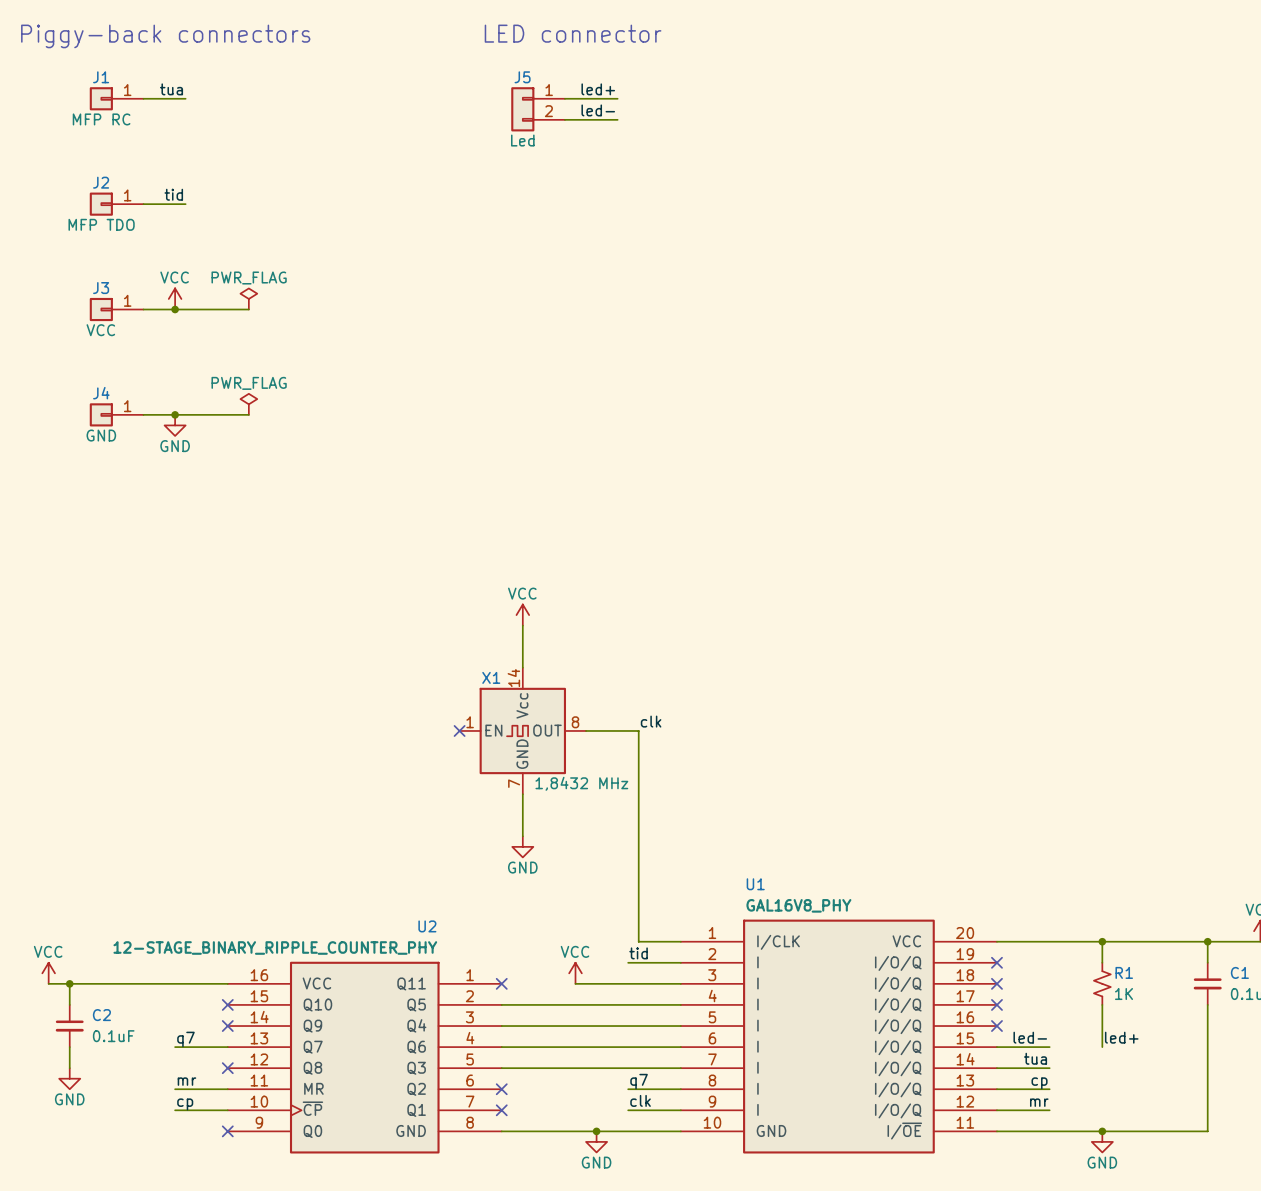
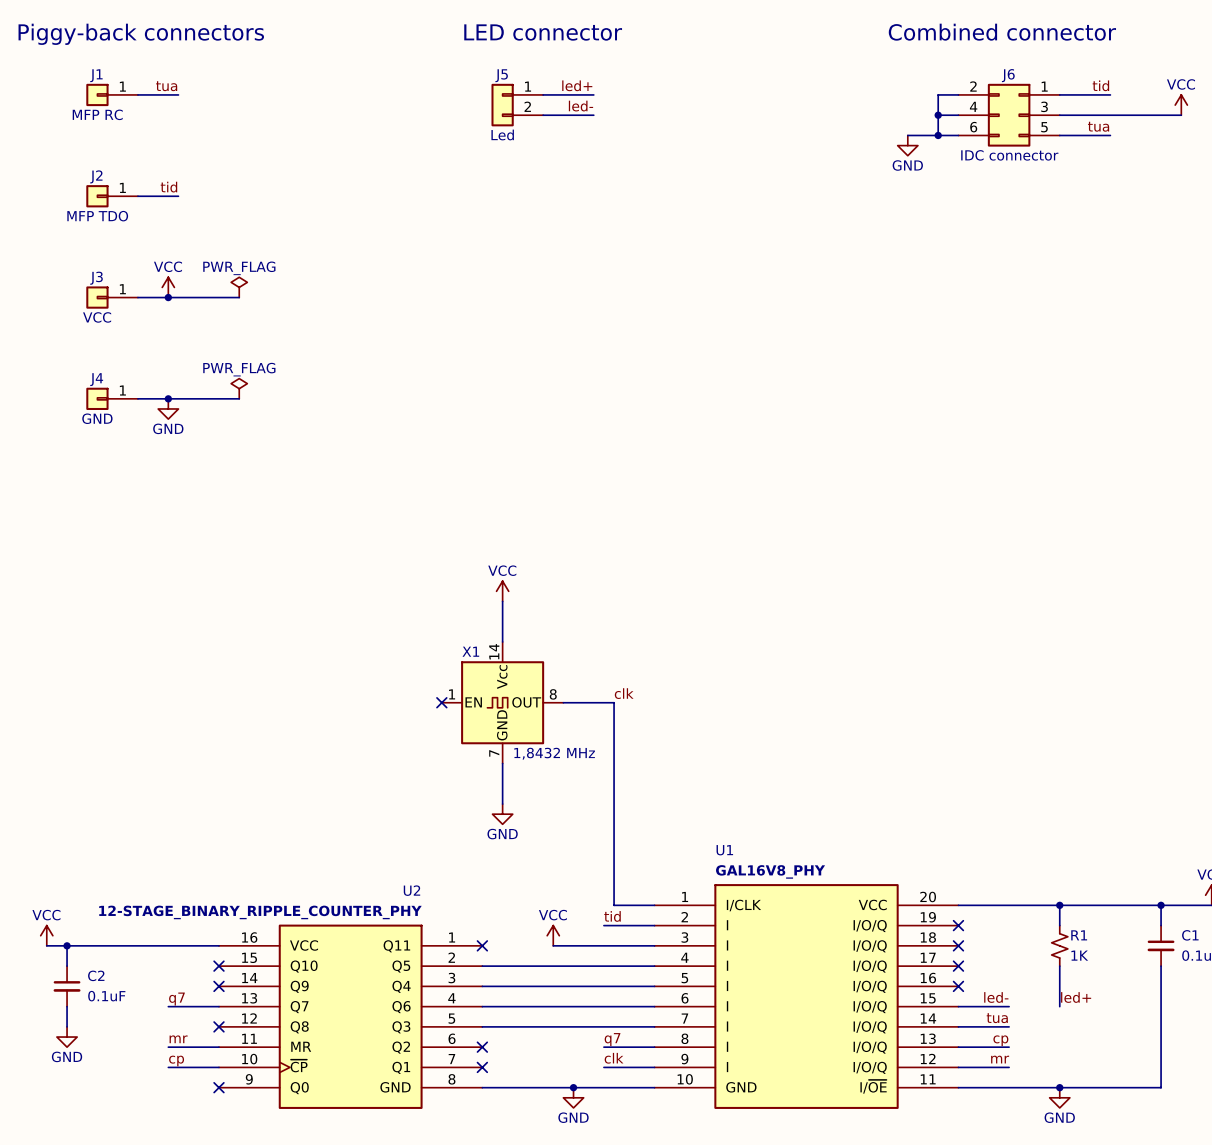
text: none -> Combined connector (1002, 32)
label: none -> tid (1100, 85)
wire: none -> (958, 94) (938, 94) (938, 135)
wire: none -> (1059, 94) (1110, 94)
power symbol: none -> VCC (1181, 105)
wire: none -> (938, 115) (958, 115)
junction: none -> (938, 115)
J6: none -> IDC connector (1009, 115)
wire: none -> (1059, 115) (1181, 115)
label: none -> tua (1098, 126)
wire: none -> (907, 135) (958, 135)
junction: none -> (938, 135)
wire: none -> (1059, 135) (1110, 135)
power symbol: none -> GND (907, 145)

